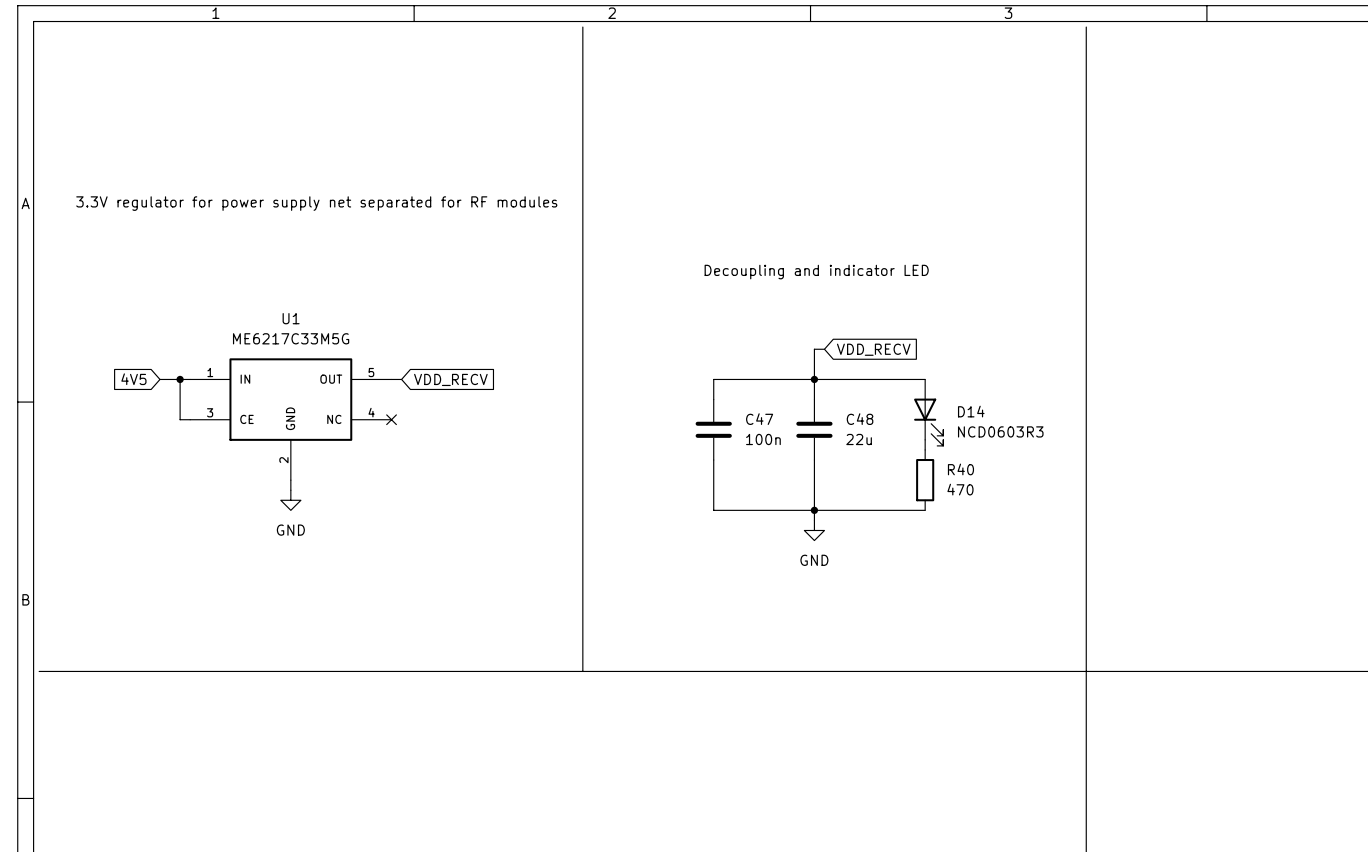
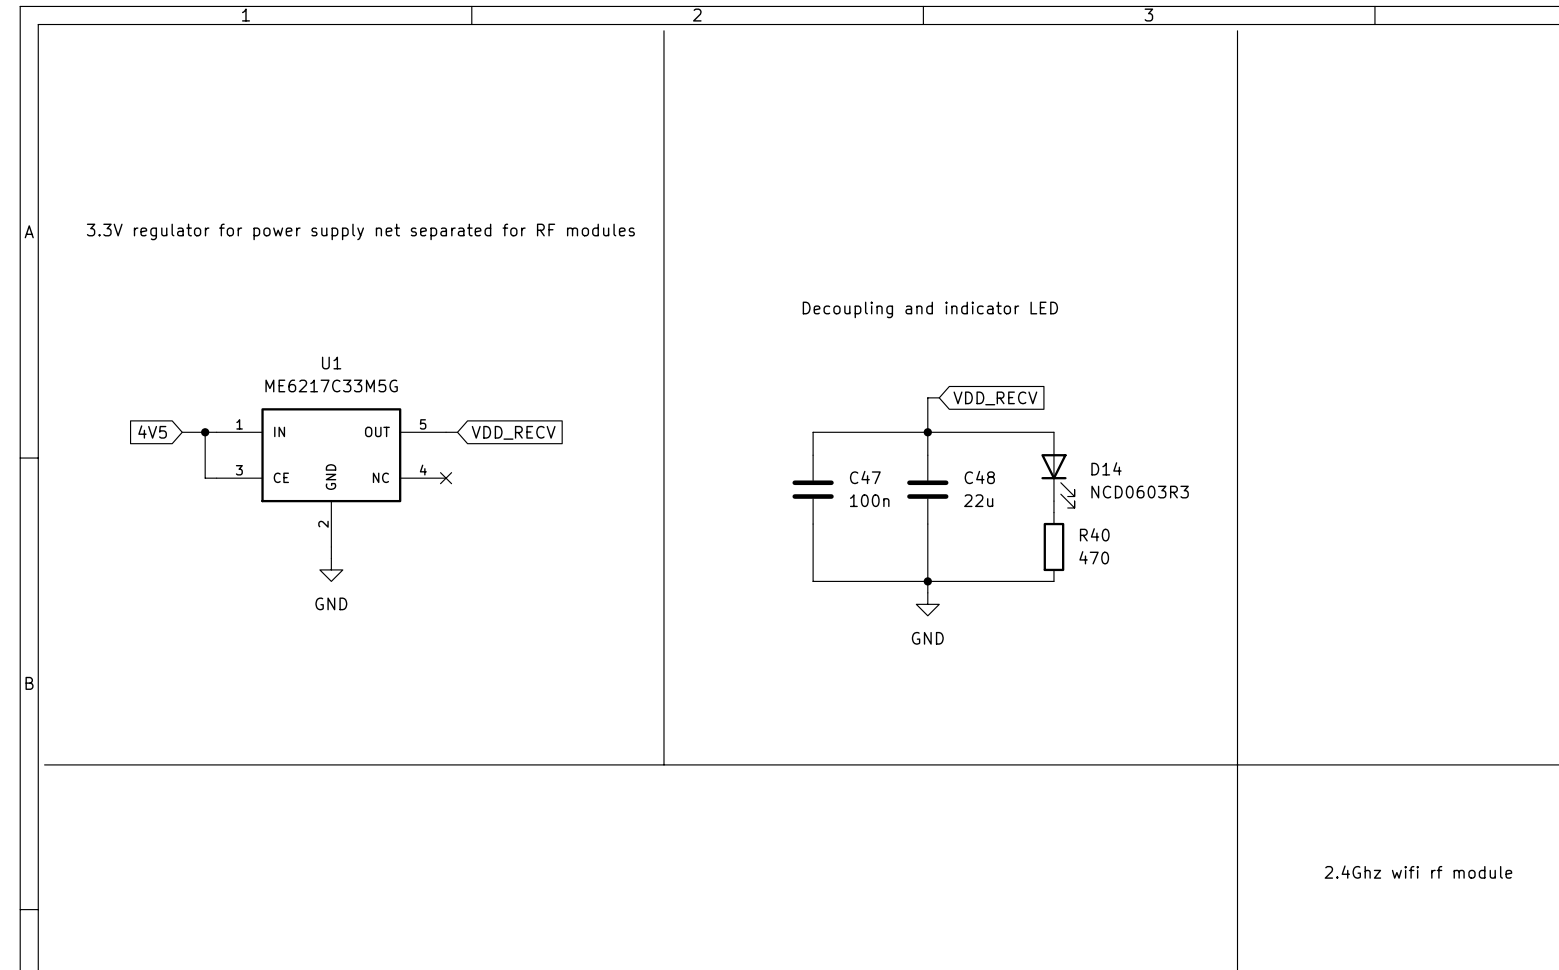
text: none -> 2.4Ghz wifi rf module (1418, 872)

